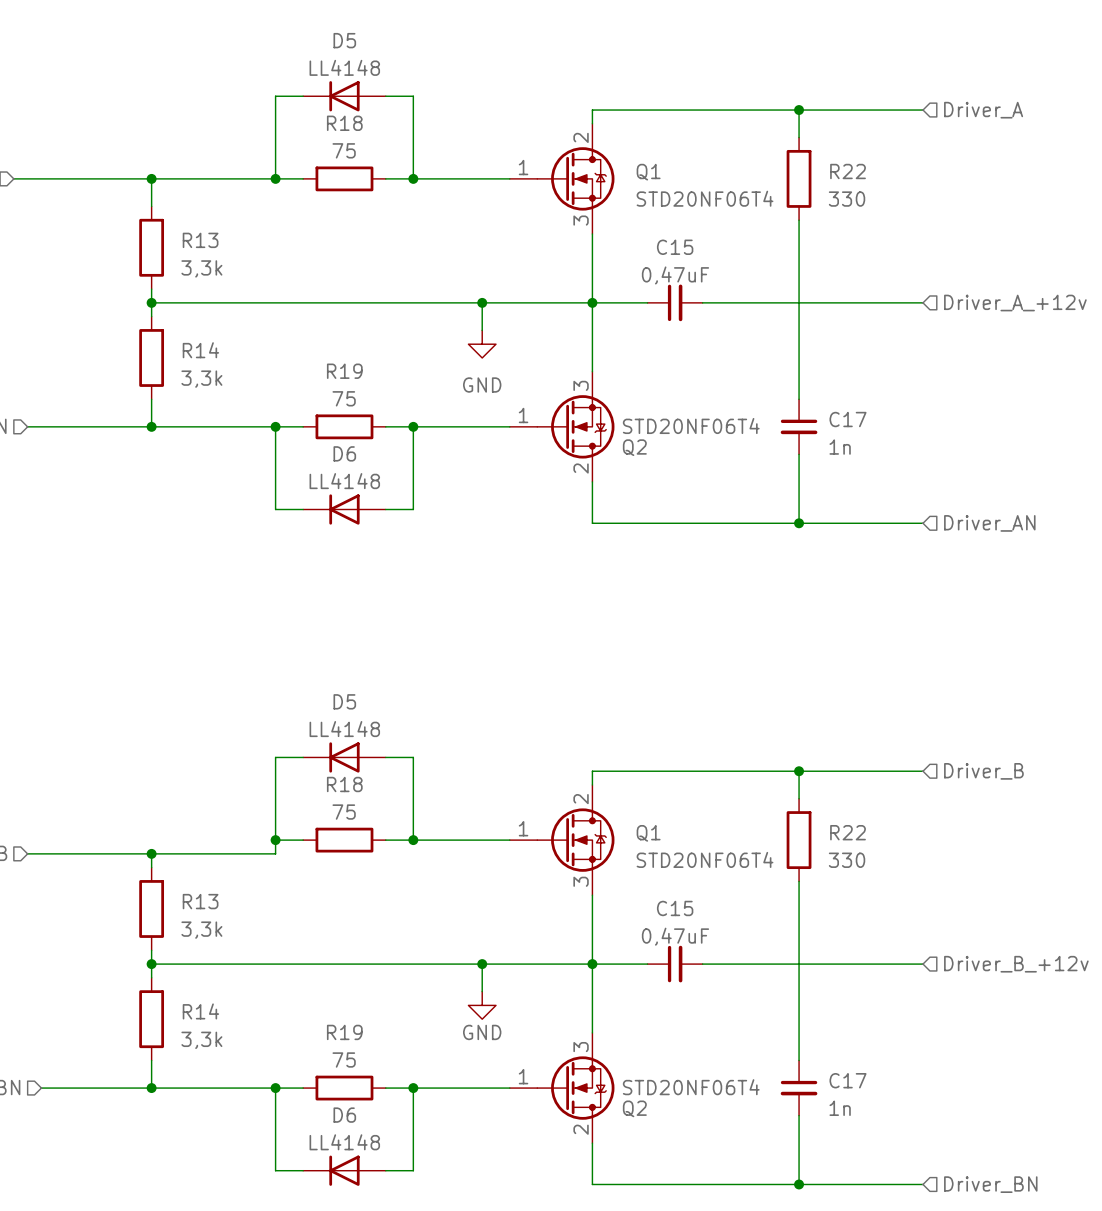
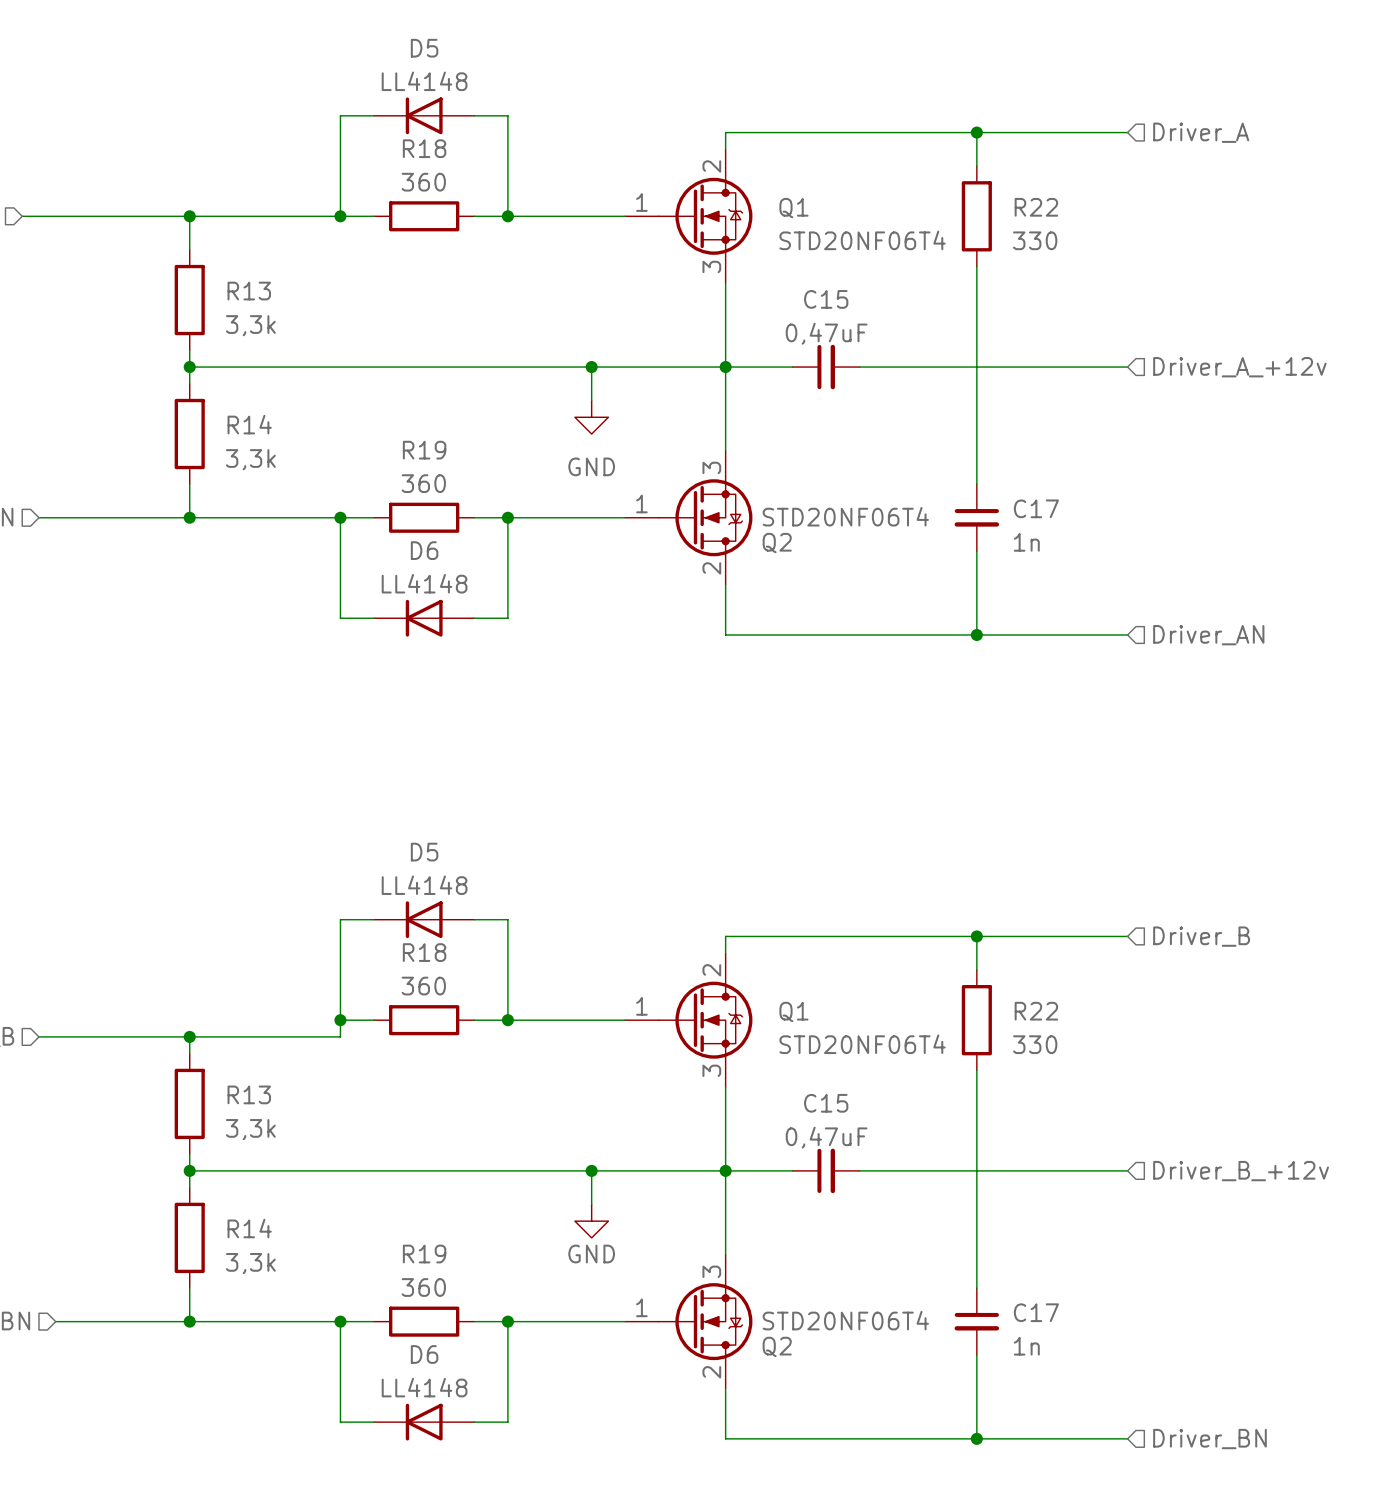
R18 value: 75 (344, 150) -> 360 (423, 182)
R19 value: 75 (344, 398) -> 360 (423, 483)
R18 value: 75 (344, 812) -> 360 (423, 986)
R19 value: 75 (344, 1059) -> 360 (423, 1287)

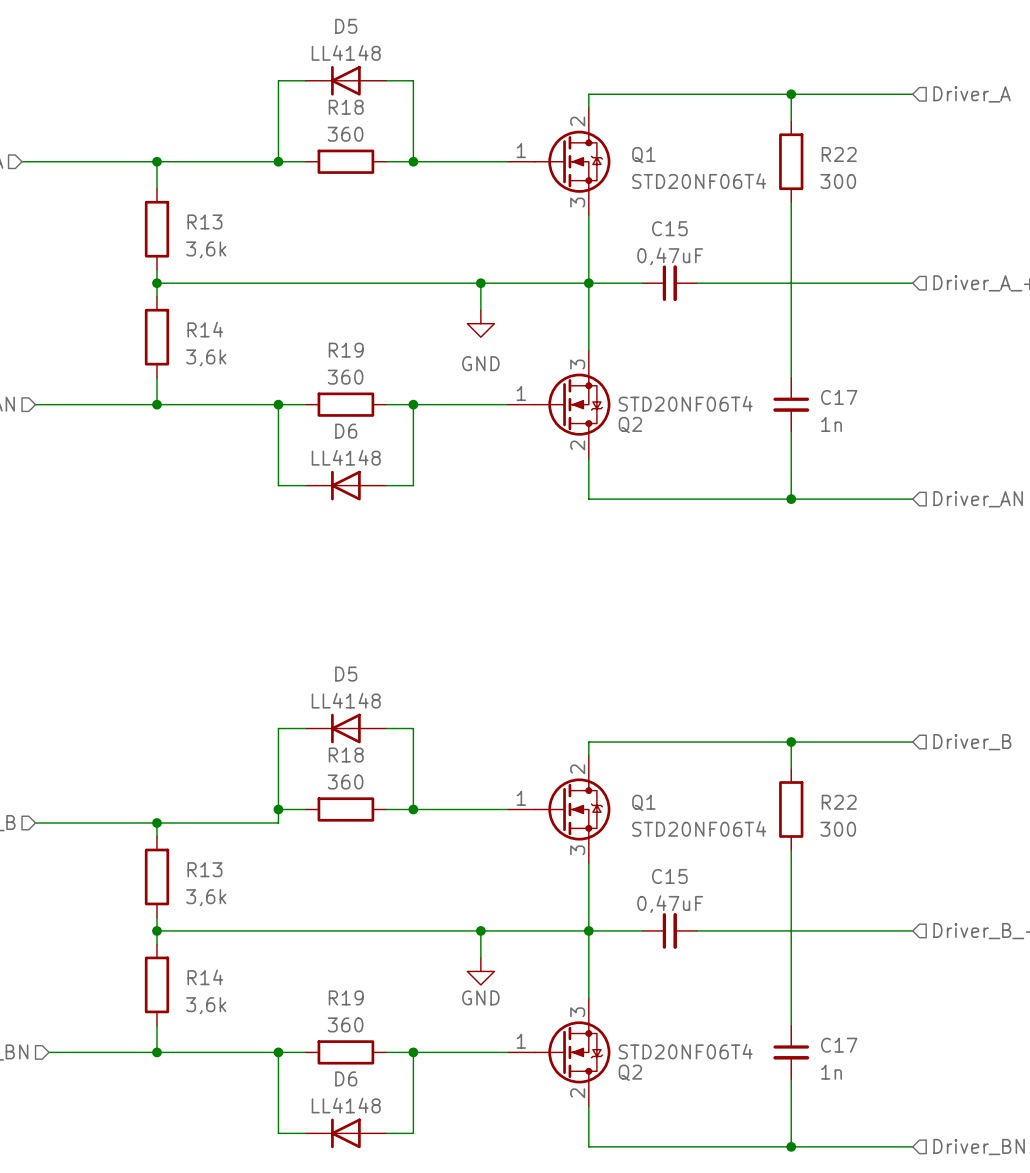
R22 value: 330 (1035, 240) -> 300 (838, 181)
R13 value: 3,3k (250, 325) -> 3,6k (206, 249)
R14 value: 3,3k (250, 459) -> 3,6k (206, 357)
R22 value: 330 (1035, 1044) -> 300 (838, 829)
R13 value: 3,3k (250, 1129) -> 3,6k (206, 897)
R14 value: 3,3k (250, 1263) -> 3,6k (206, 1005)

